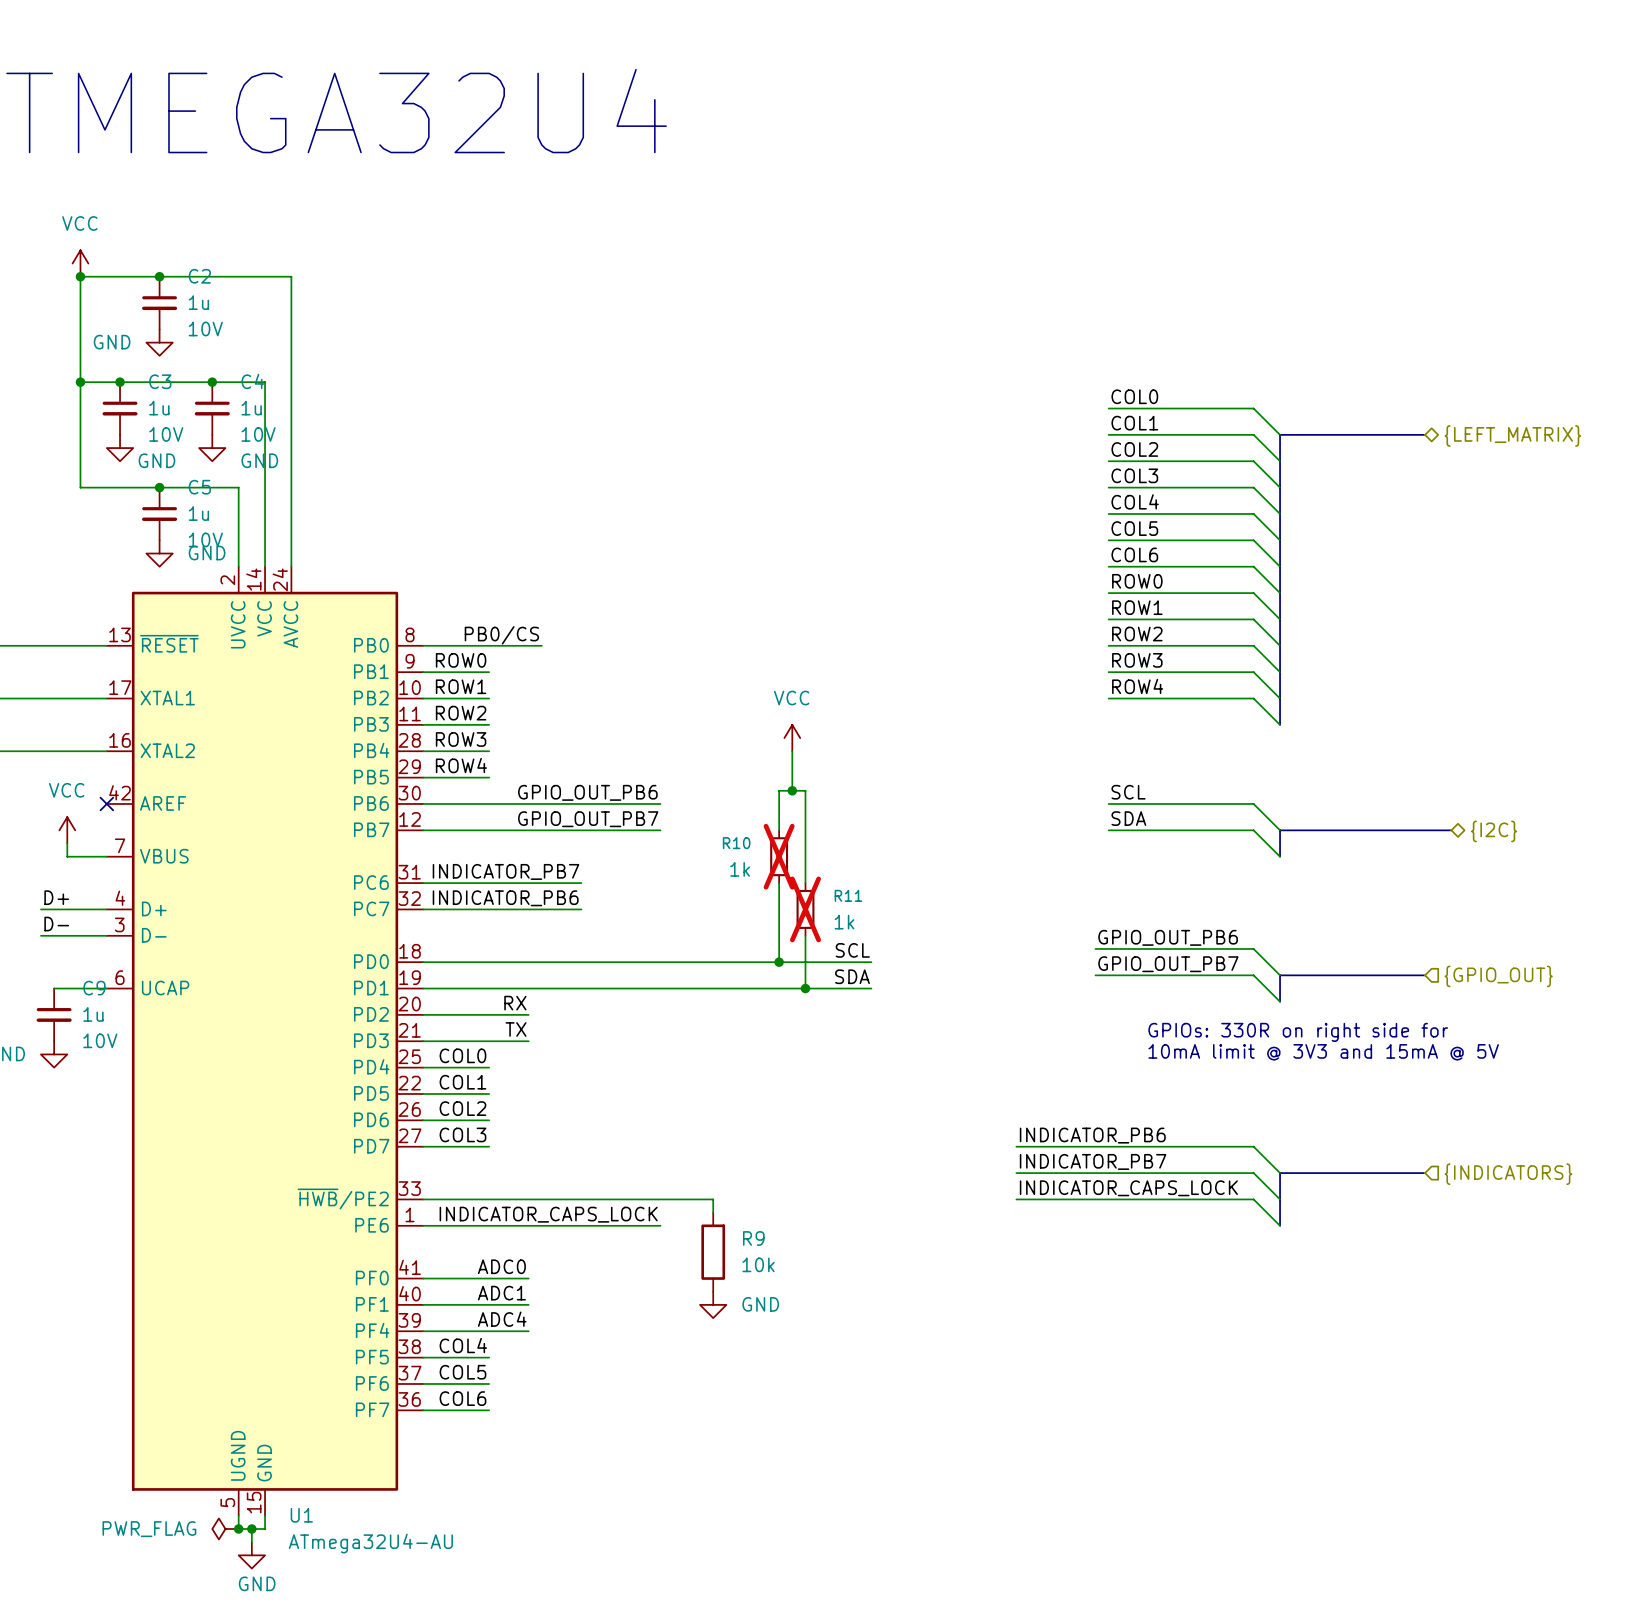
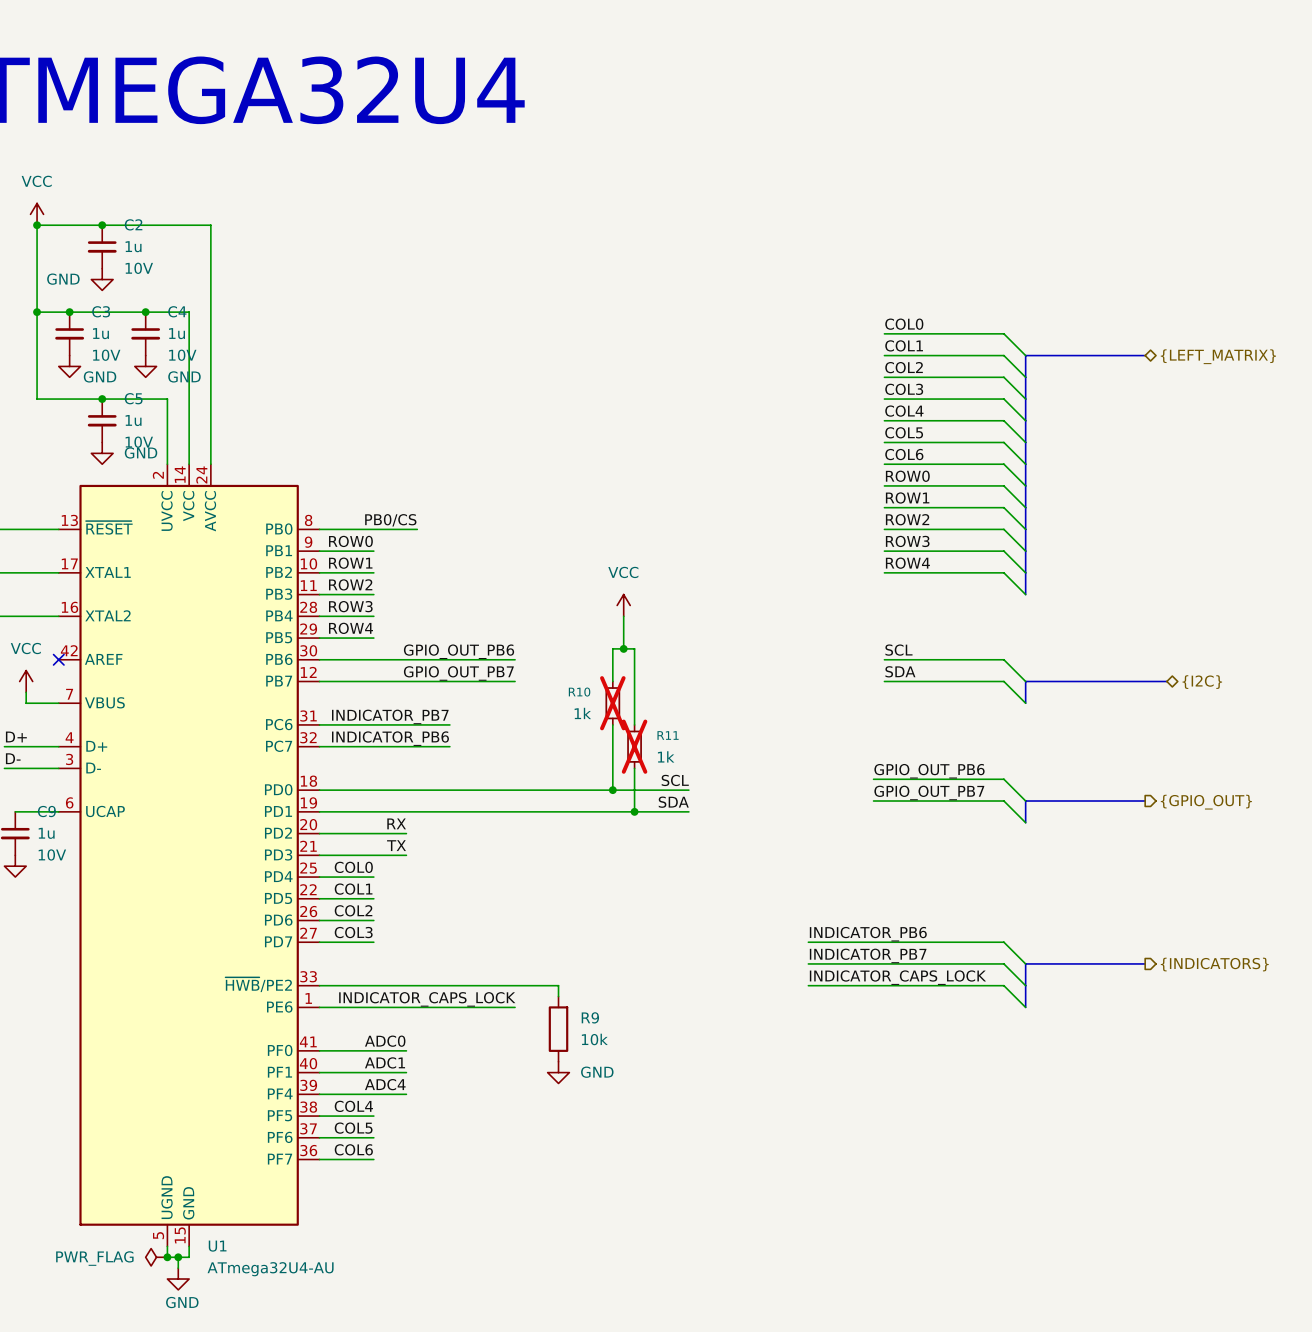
hierarchical label shape: input (1498, 976) -> output (1206, 802)
text: GPIOs: 330R on right side for (1298, 1032) -> none
text: 10mA limit @ 3V3 and 15mA @ 5V (1323, 1052) -> none
hierarchical label shape: input (1508, 1174) -> output (1214, 964)

